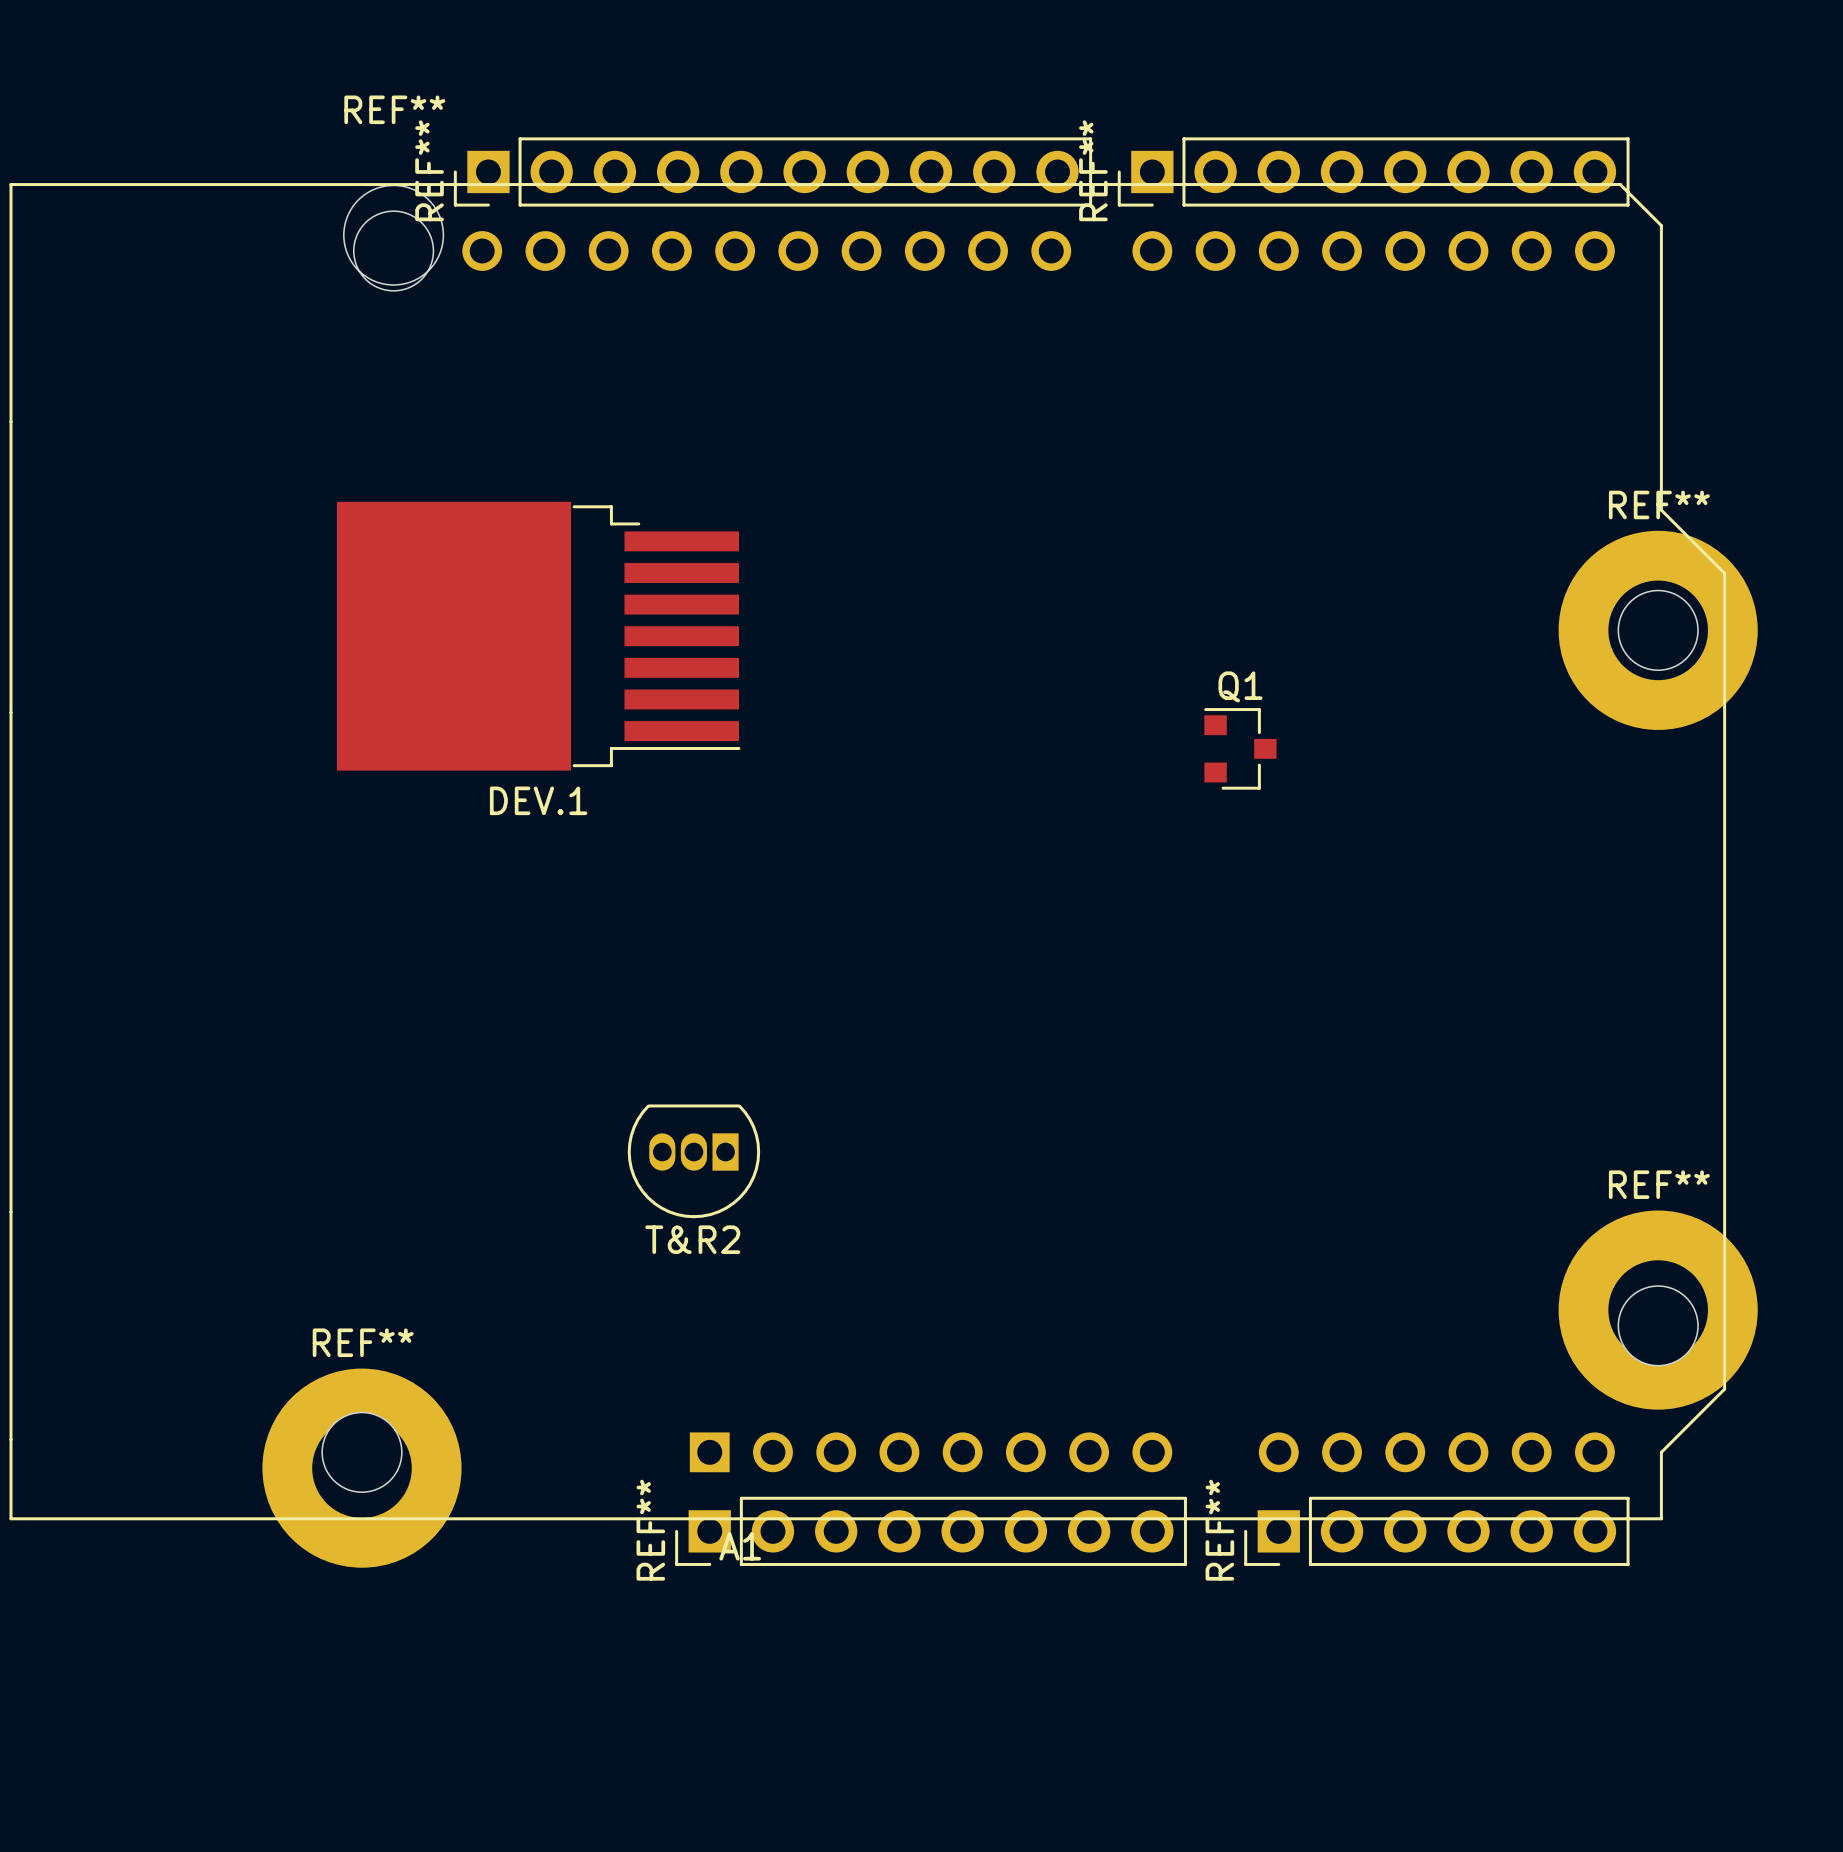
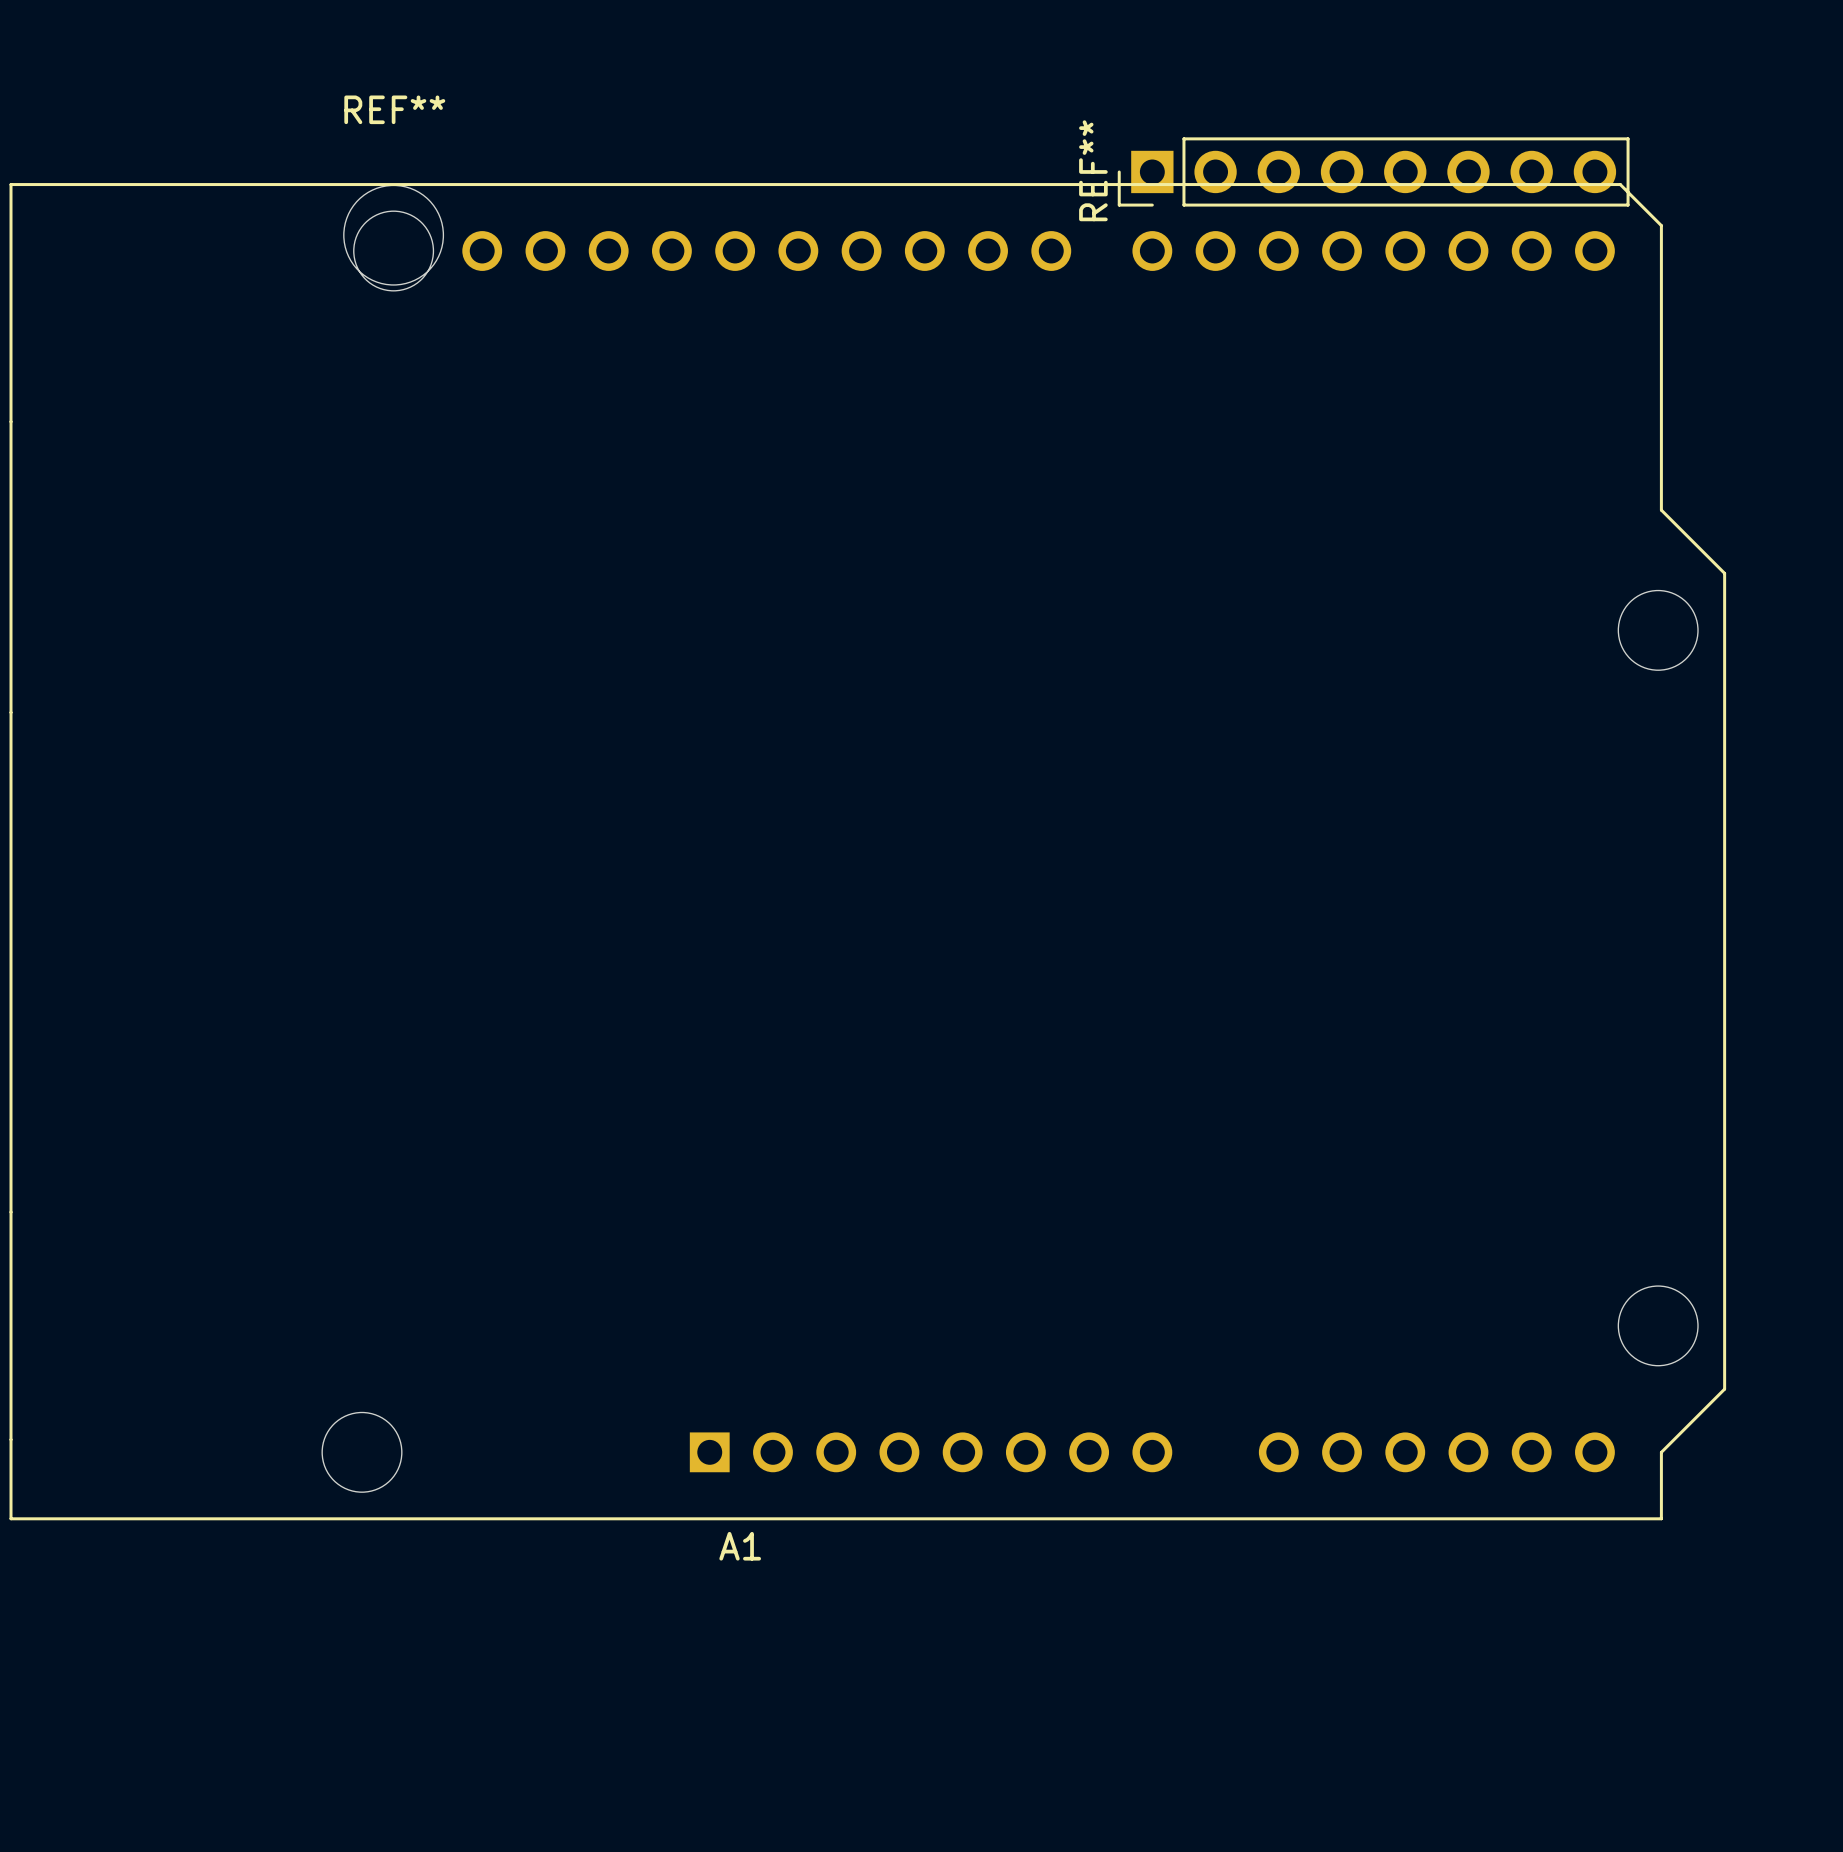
REF**: (772, 171) -> none
REF**: (1658, 630) -> none
DEV.1: (538, 636) -> none
Q1: (1240, 748) -> none
T&R2: (693, 1161) -> none
REF**: (1658, 1310) -> none
REF**: (361, 1468) -> none
REF**: (931, 1531) -> none
REF**: (1436, 1531) -> none

